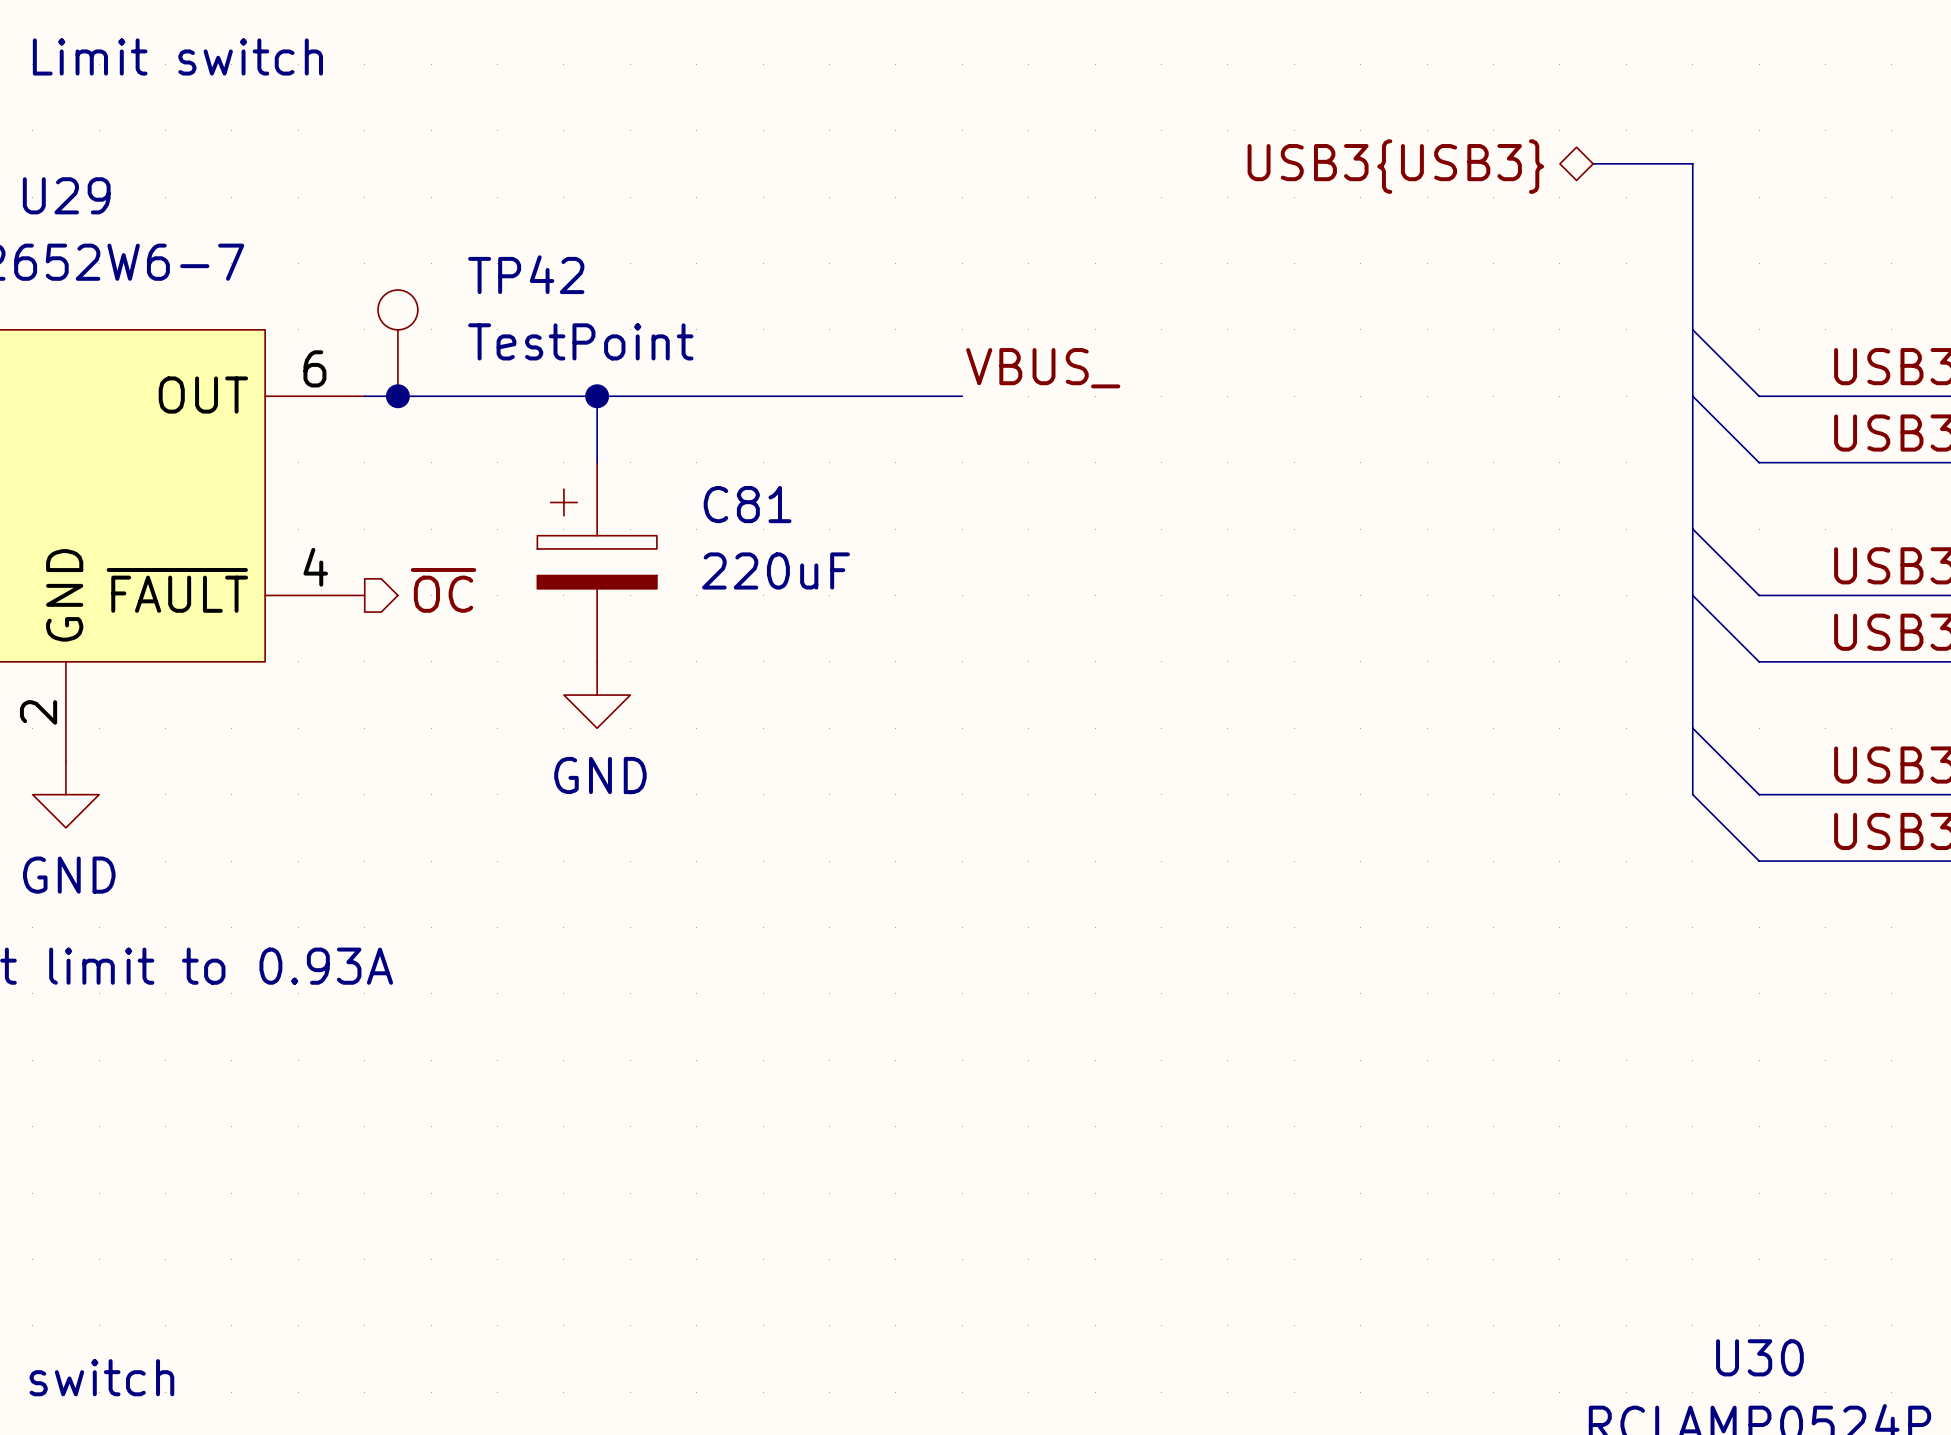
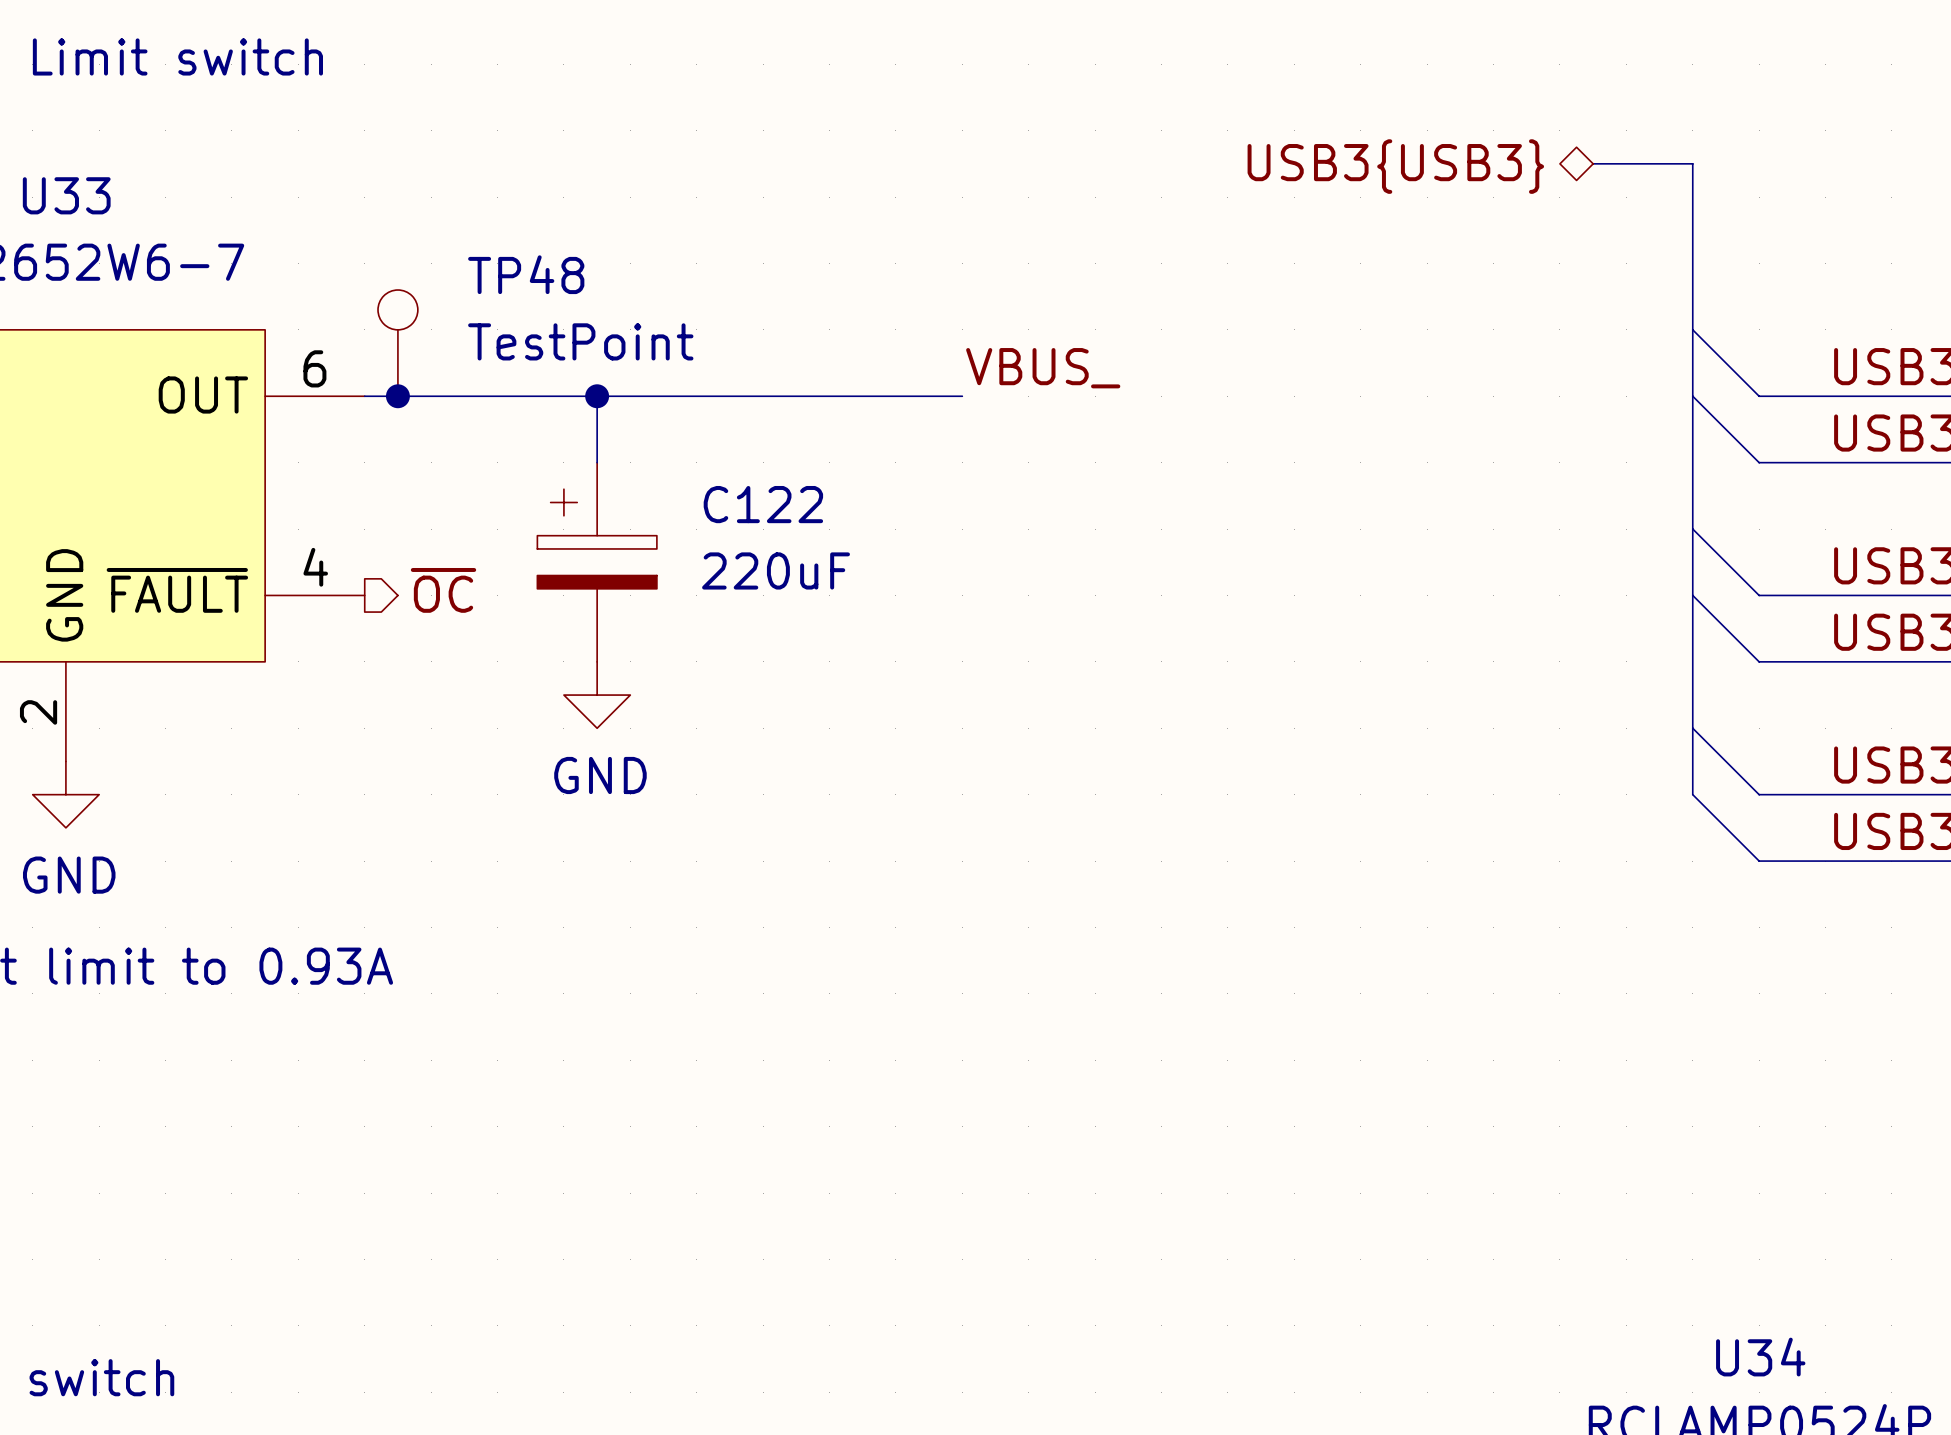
U29 name: U29 (66, 195) -> U33 (66, 195)
TP42 name: TP42 (526, 274) -> TP48 (526, 274)
C81 name: C81 (747, 504) -> C122 (763, 504)
U30 name: U30 (1759, 1357) -> U34 (1760, 1357)

